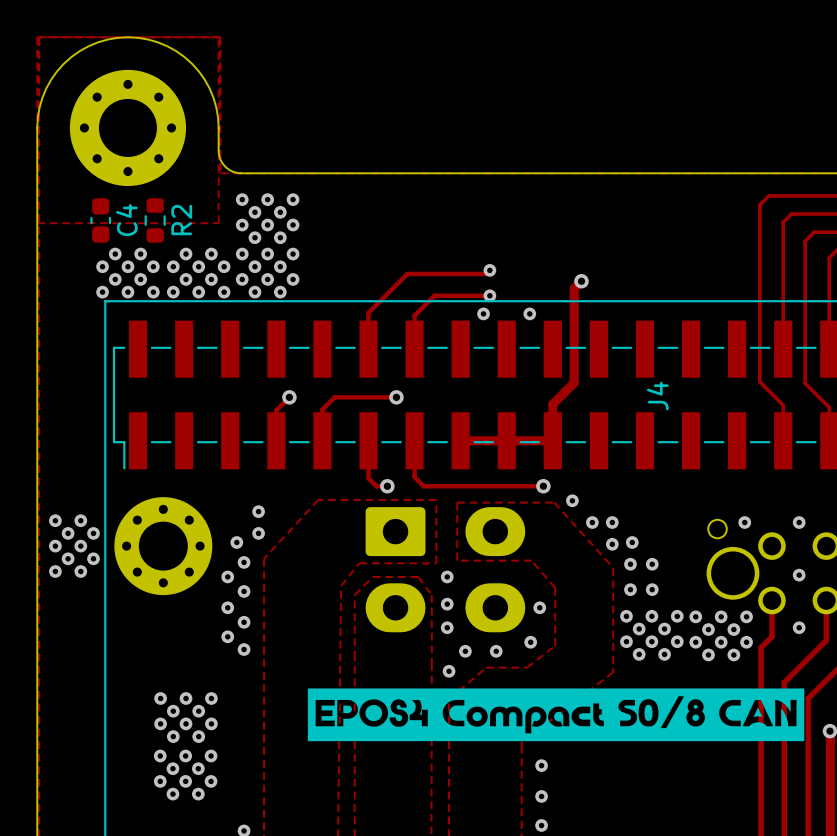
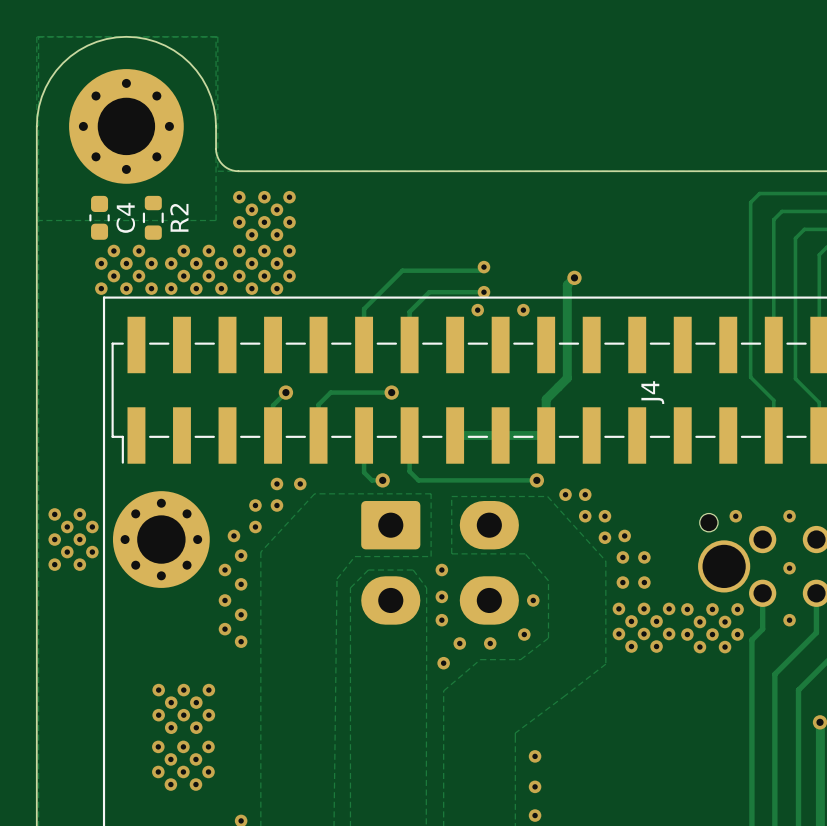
via: none -> (276, 483)
via: none -> (300, 483)
via: none -> (585, 494)
via: none -> (276, 505)
drawing: [307, 688, 805, 742] -> none

